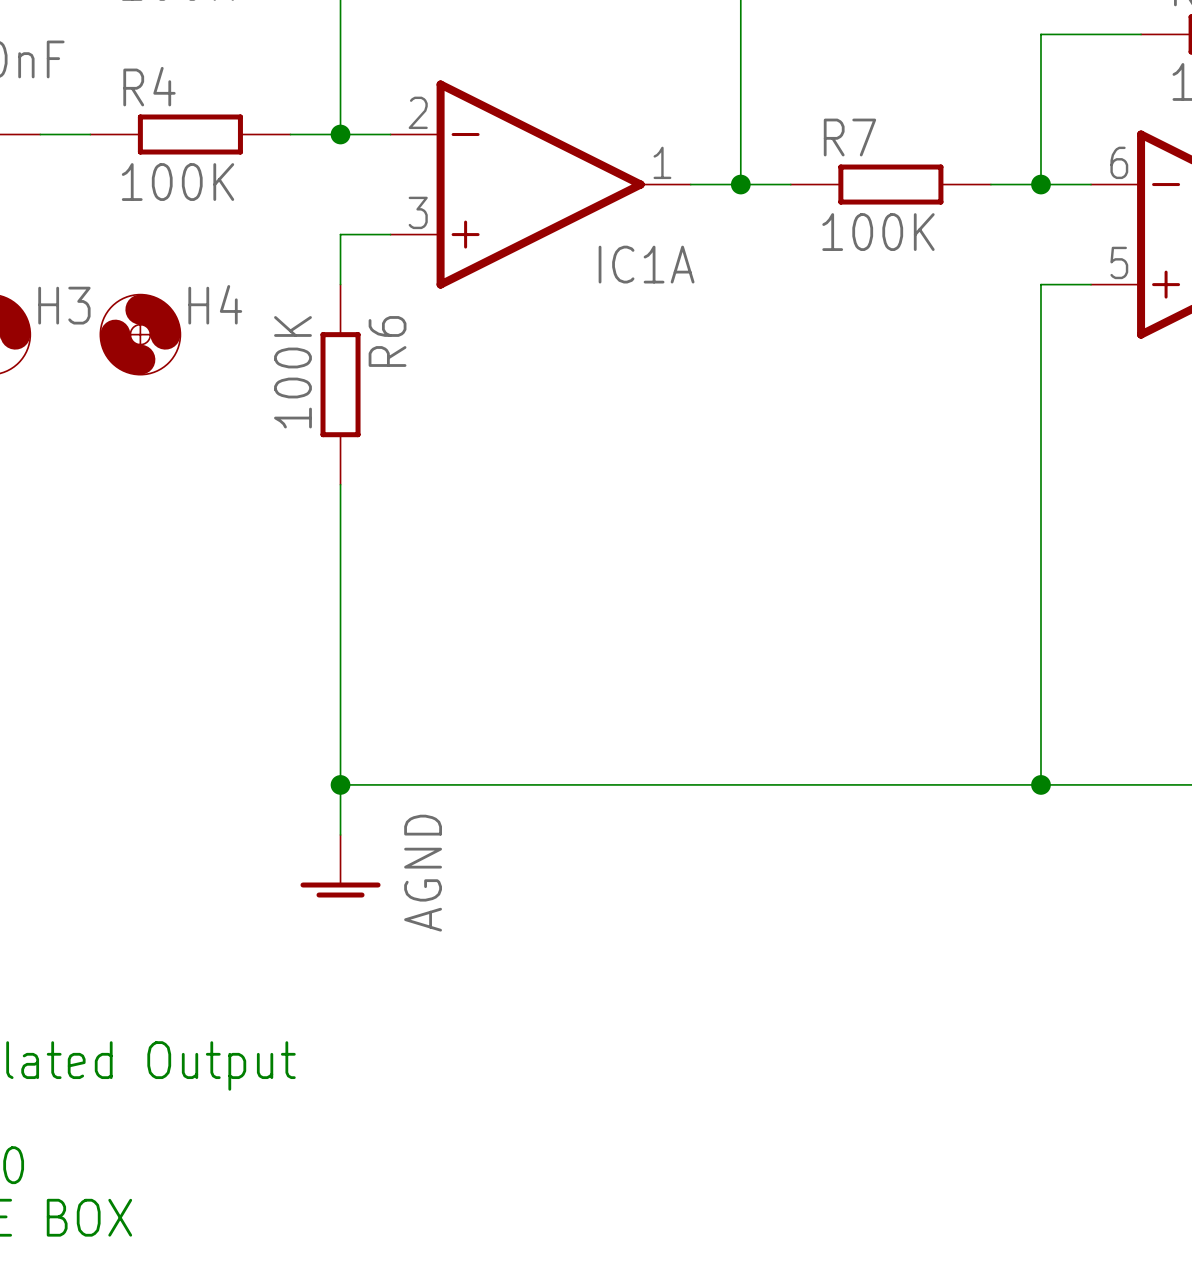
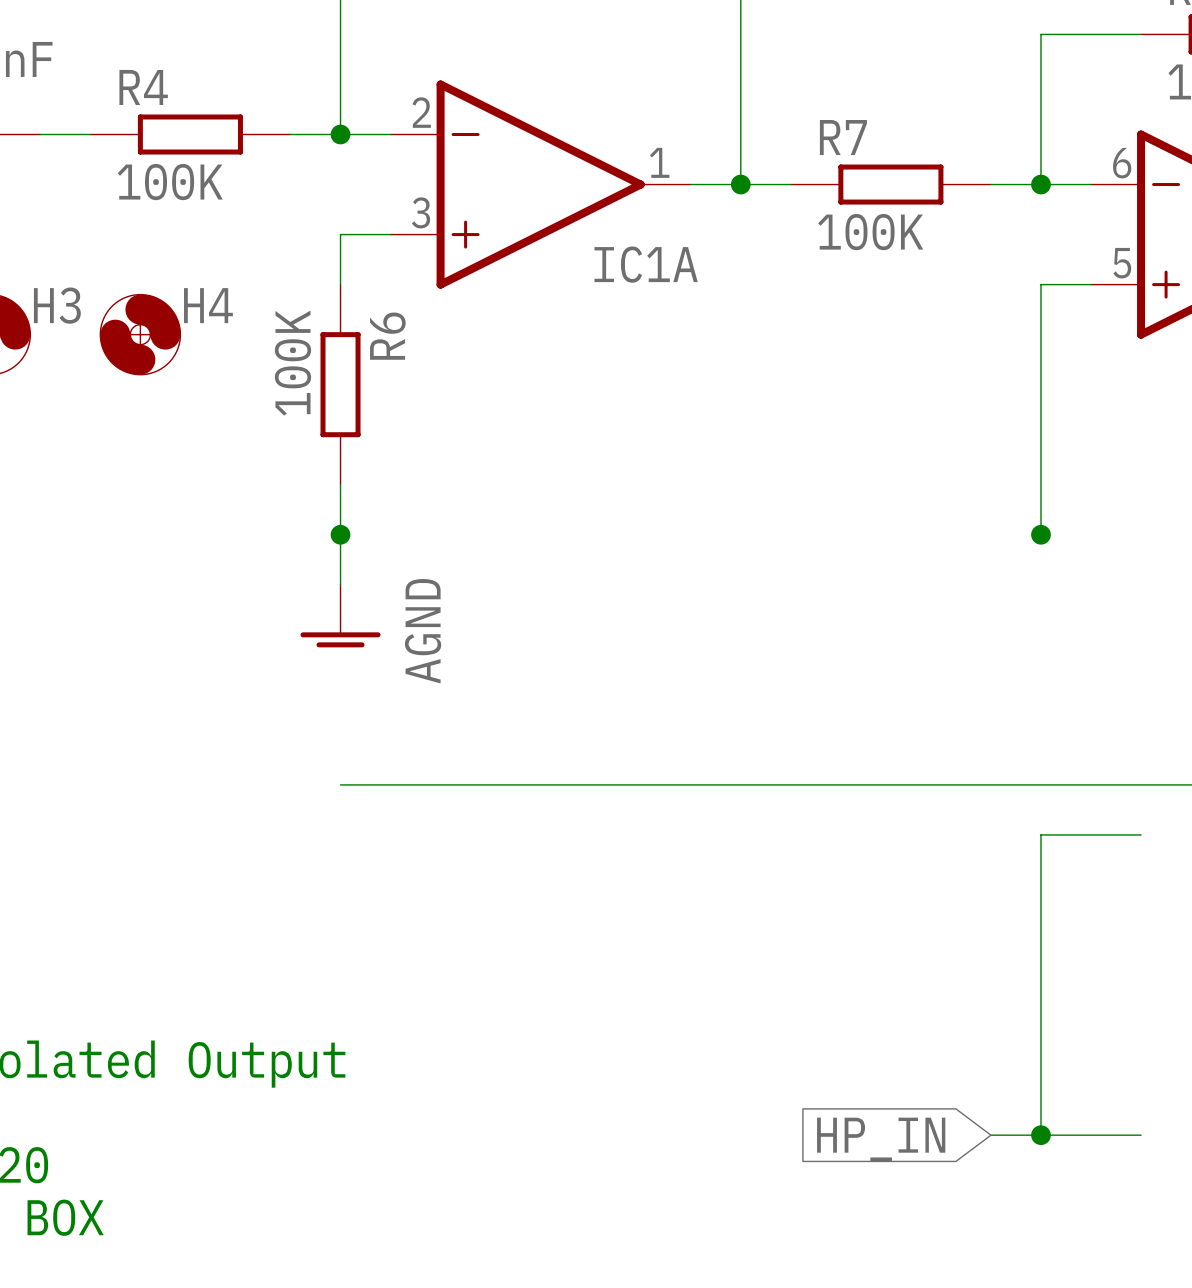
junction: none -> (340, 534)
wire: (1040, 534) (1040, 784) -> none
junction: none -> (1040, 534)
wire: (340, 584) (340, 834) -> none
junction: (340, 784) -> none
junction: (1040, 784) -> none
wire: none -> (1141, 834) (1040, 834) (1040, 1135)
power symbol position: AGND (340, 866) -> AGND (340, 616)
wire: none -> (990, 1135) (1141, 1135)
junction: none -> (1040, 1135)
global label: none -> HP_IN (881, 1139)

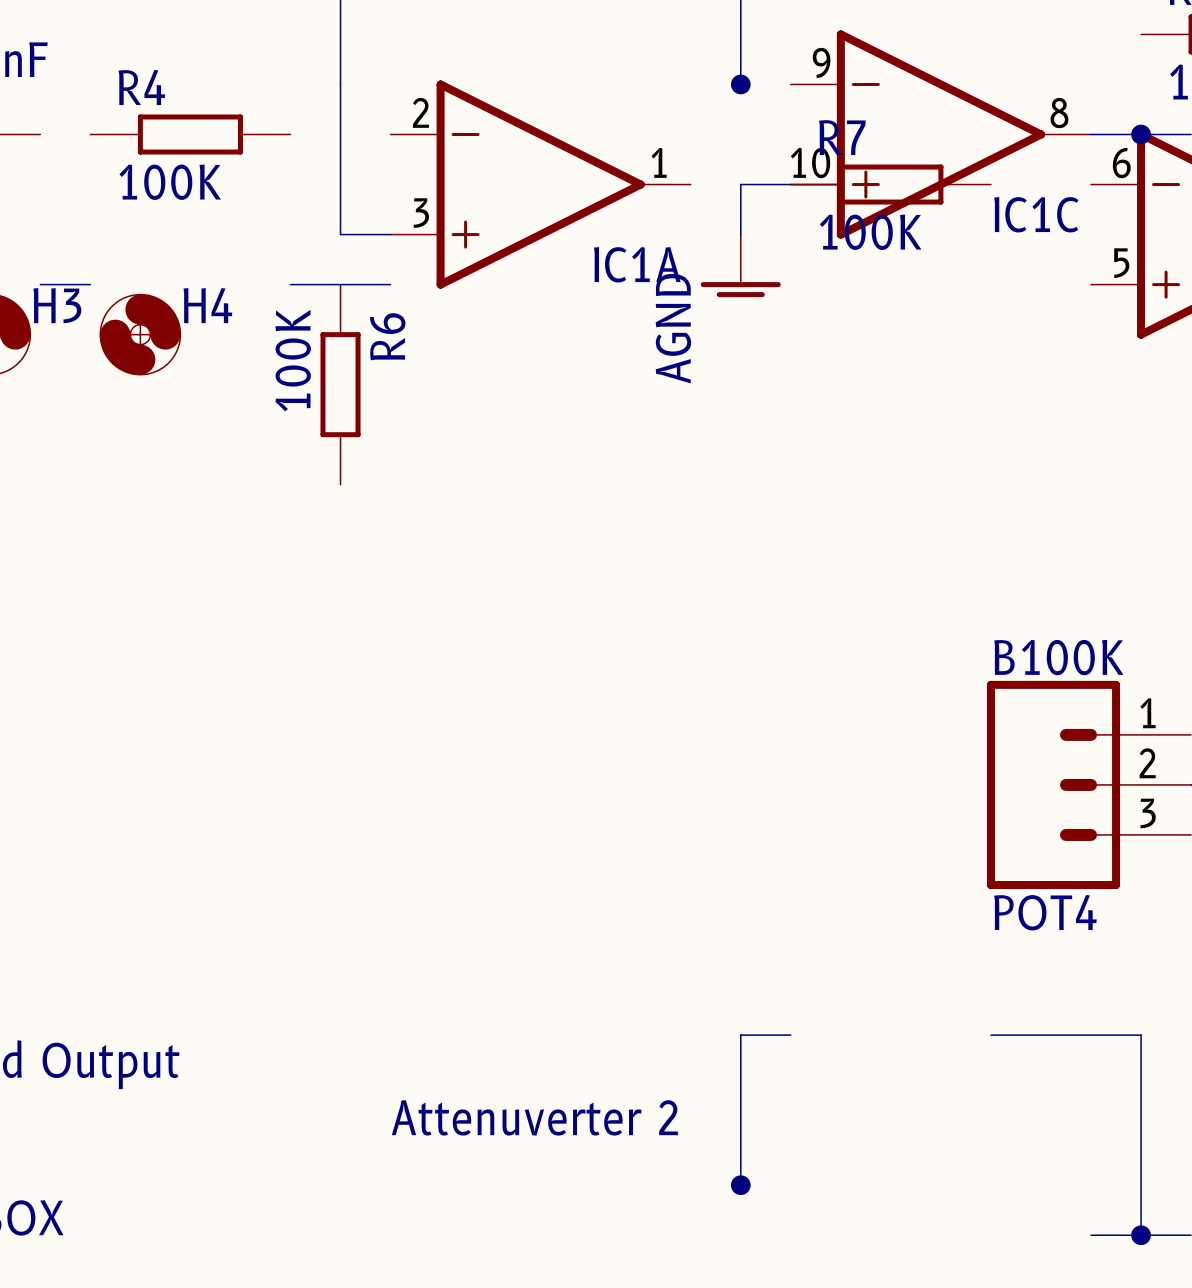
wire: (1141, 34) (1040, 34) (1040, 184) -> none
wire: (740, 84) (740, 184) (690, 184) -> none
junction: none -> (740, 84)
wire: (40, 134) (90, 134) -> (40, 284) (90, 284)
wire: (290, 134) (390, 134) -> (290, 284) (390, 284)
junction: (340, 134) -> none
IC1C: none -> (940, 134)
wire: none -> (740, 184) (740, 234)
junction: (740, 184) -> none
wire: (990, 184) (1091, 184) -> (1091, 134) (1191, 134)
junction position: (1040, 184) -> (1141, 134)
wire: (340, 234) (340, 284) -> (340, 234) (340, 134)
power symbol: none -> AGND (740, 265)
wire: (1091, 284) (1040, 284) (1040, 534) -> none
wire: (340, 484) (340, 584) -> none
junction: (340, 534) -> none
junction: (1040, 534) -> none
power symbol: AGND (340, 616) -> none
wire: (340, 784) (1191, 784) -> none
POT4: none -> B100K (1089, 784)
wire: (1141, 834) (1040, 834) (1040, 1135) -> none
wire: none -> (790, 1035) (740, 1035) (740, 1185)
wire: none -> (990, 1035) (1141, 1035) (1141, 1235)
text: none -> Attenuverter 2 (534, 1117)
wire: (990, 1135) (1141, 1135) -> none
junction: (1040, 1135) -> none
global label: HP_IN (881, 1139) -> none
junction: none -> (740, 1185)
wire: none -> (1091, 1235) (1191, 1235)
junction: none -> (1141, 1235)

